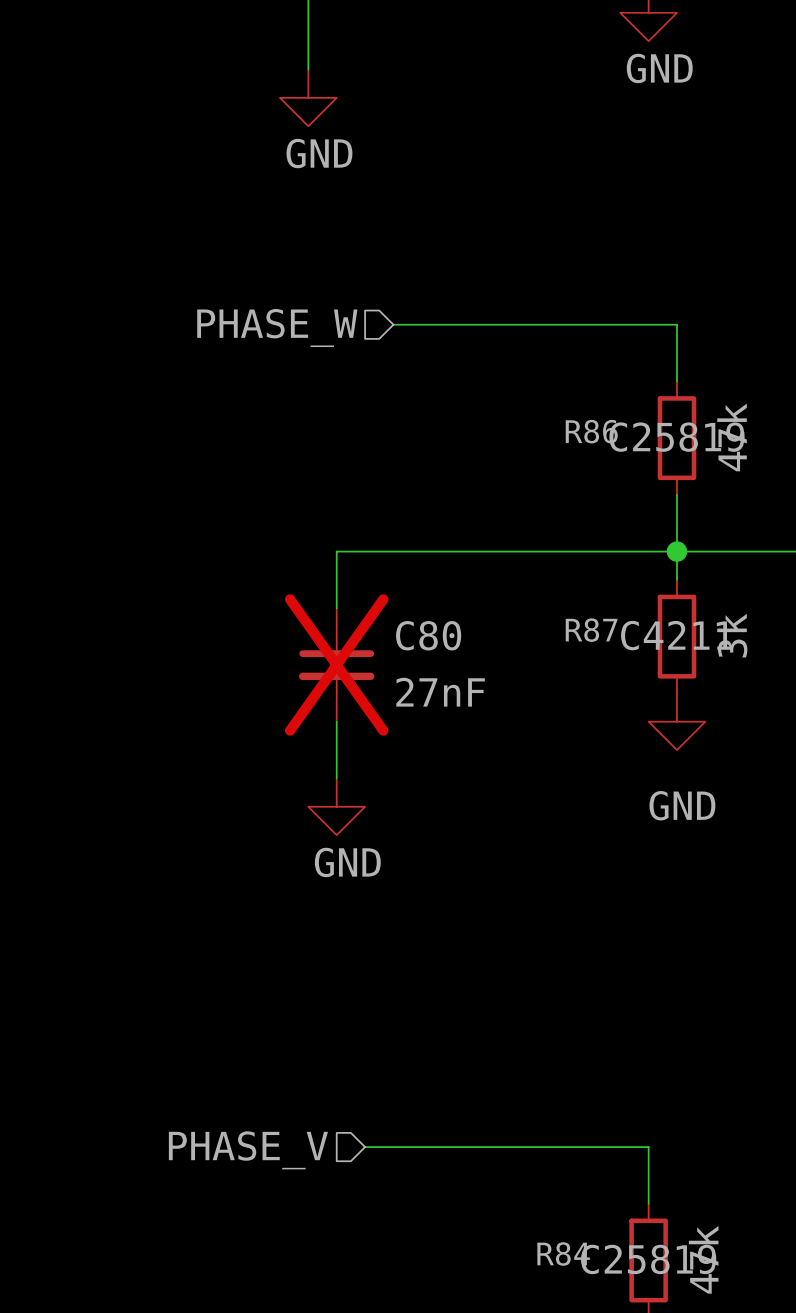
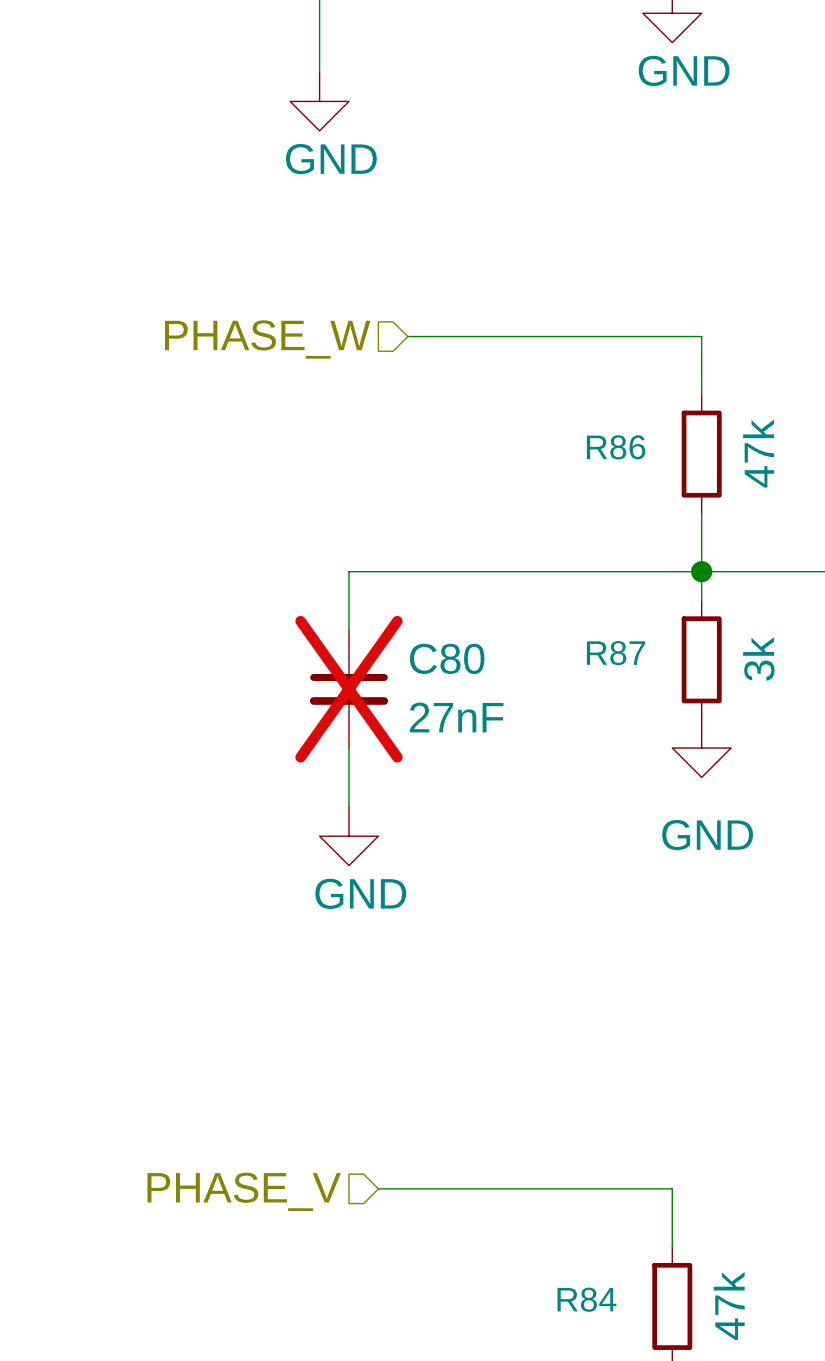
R86 text: C25819 (676, 437) -> none
R87 text: C4211 (676, 635) -> none
R84 text: C25819 (648, 1259) -> none

